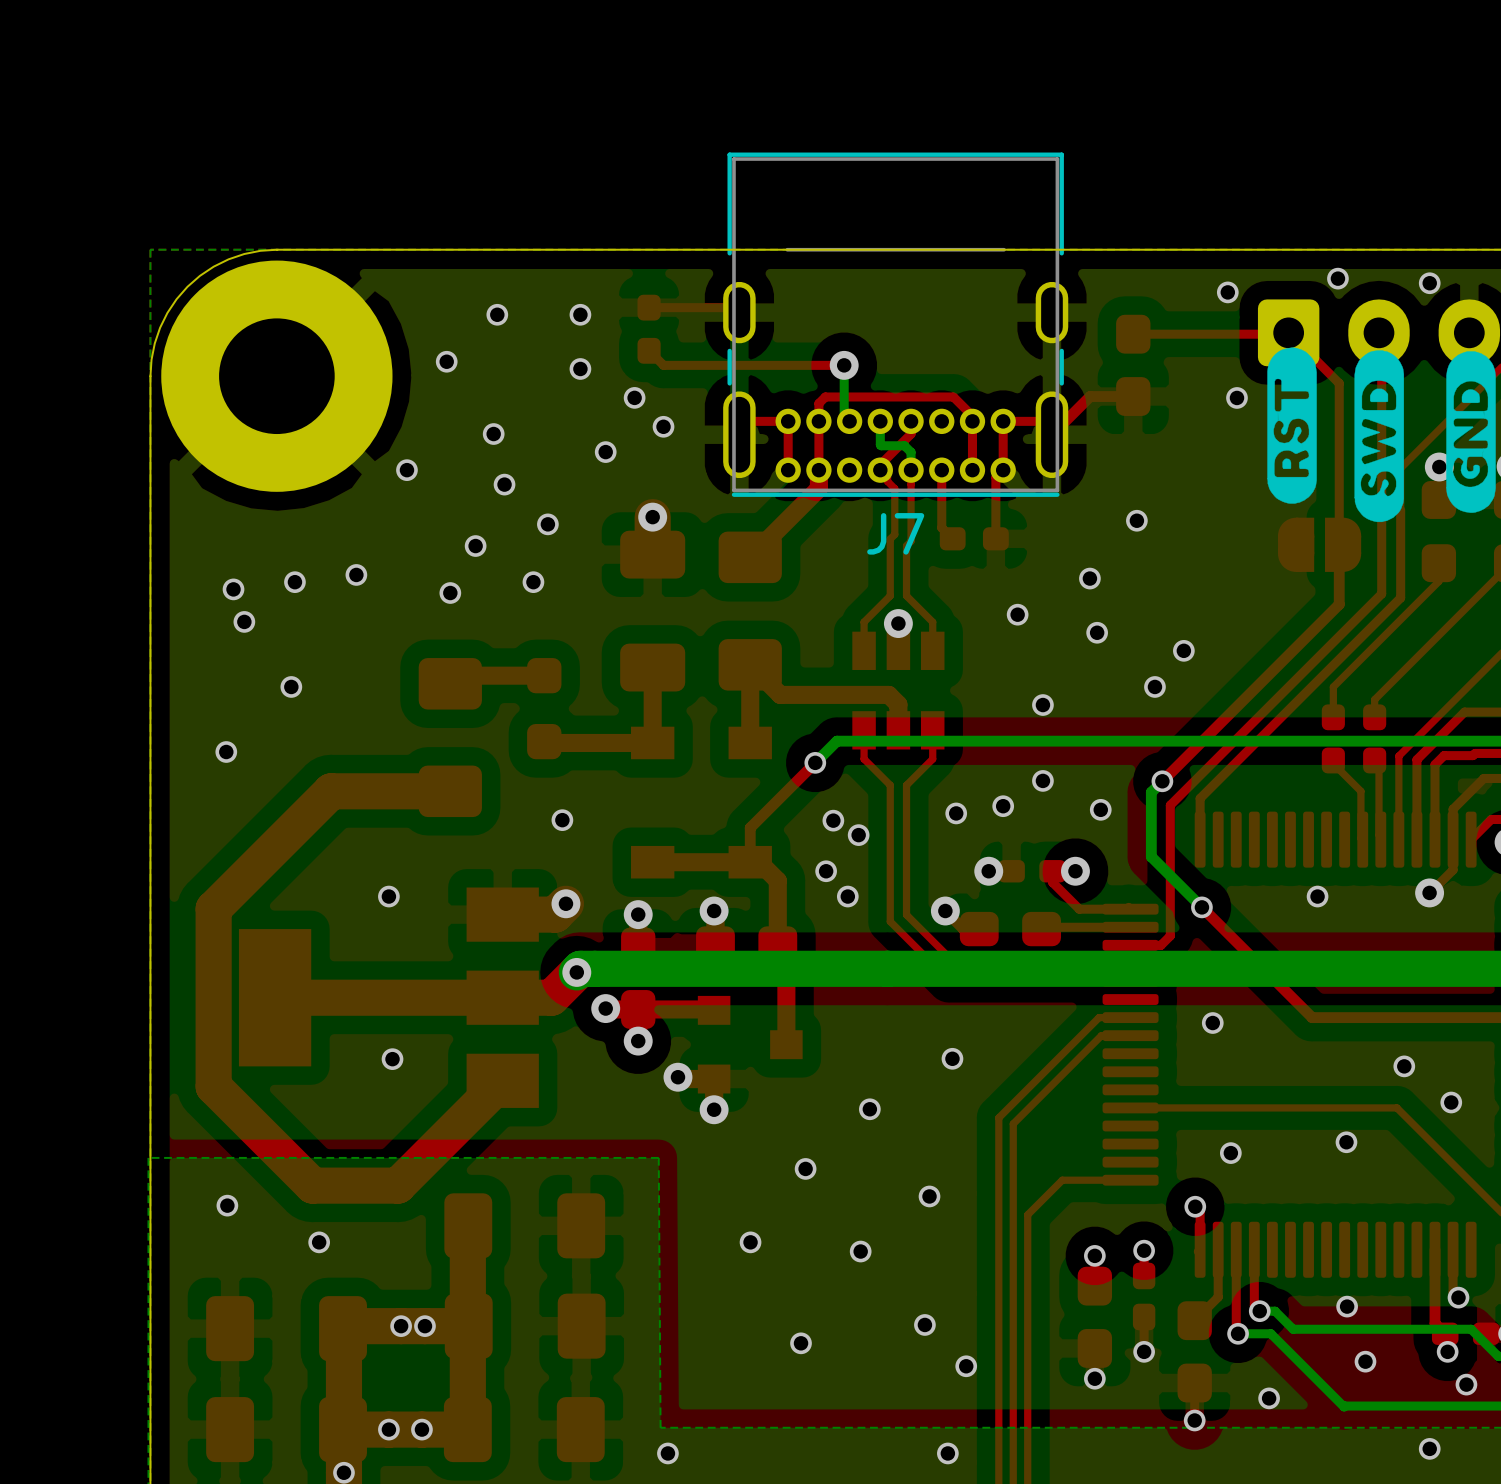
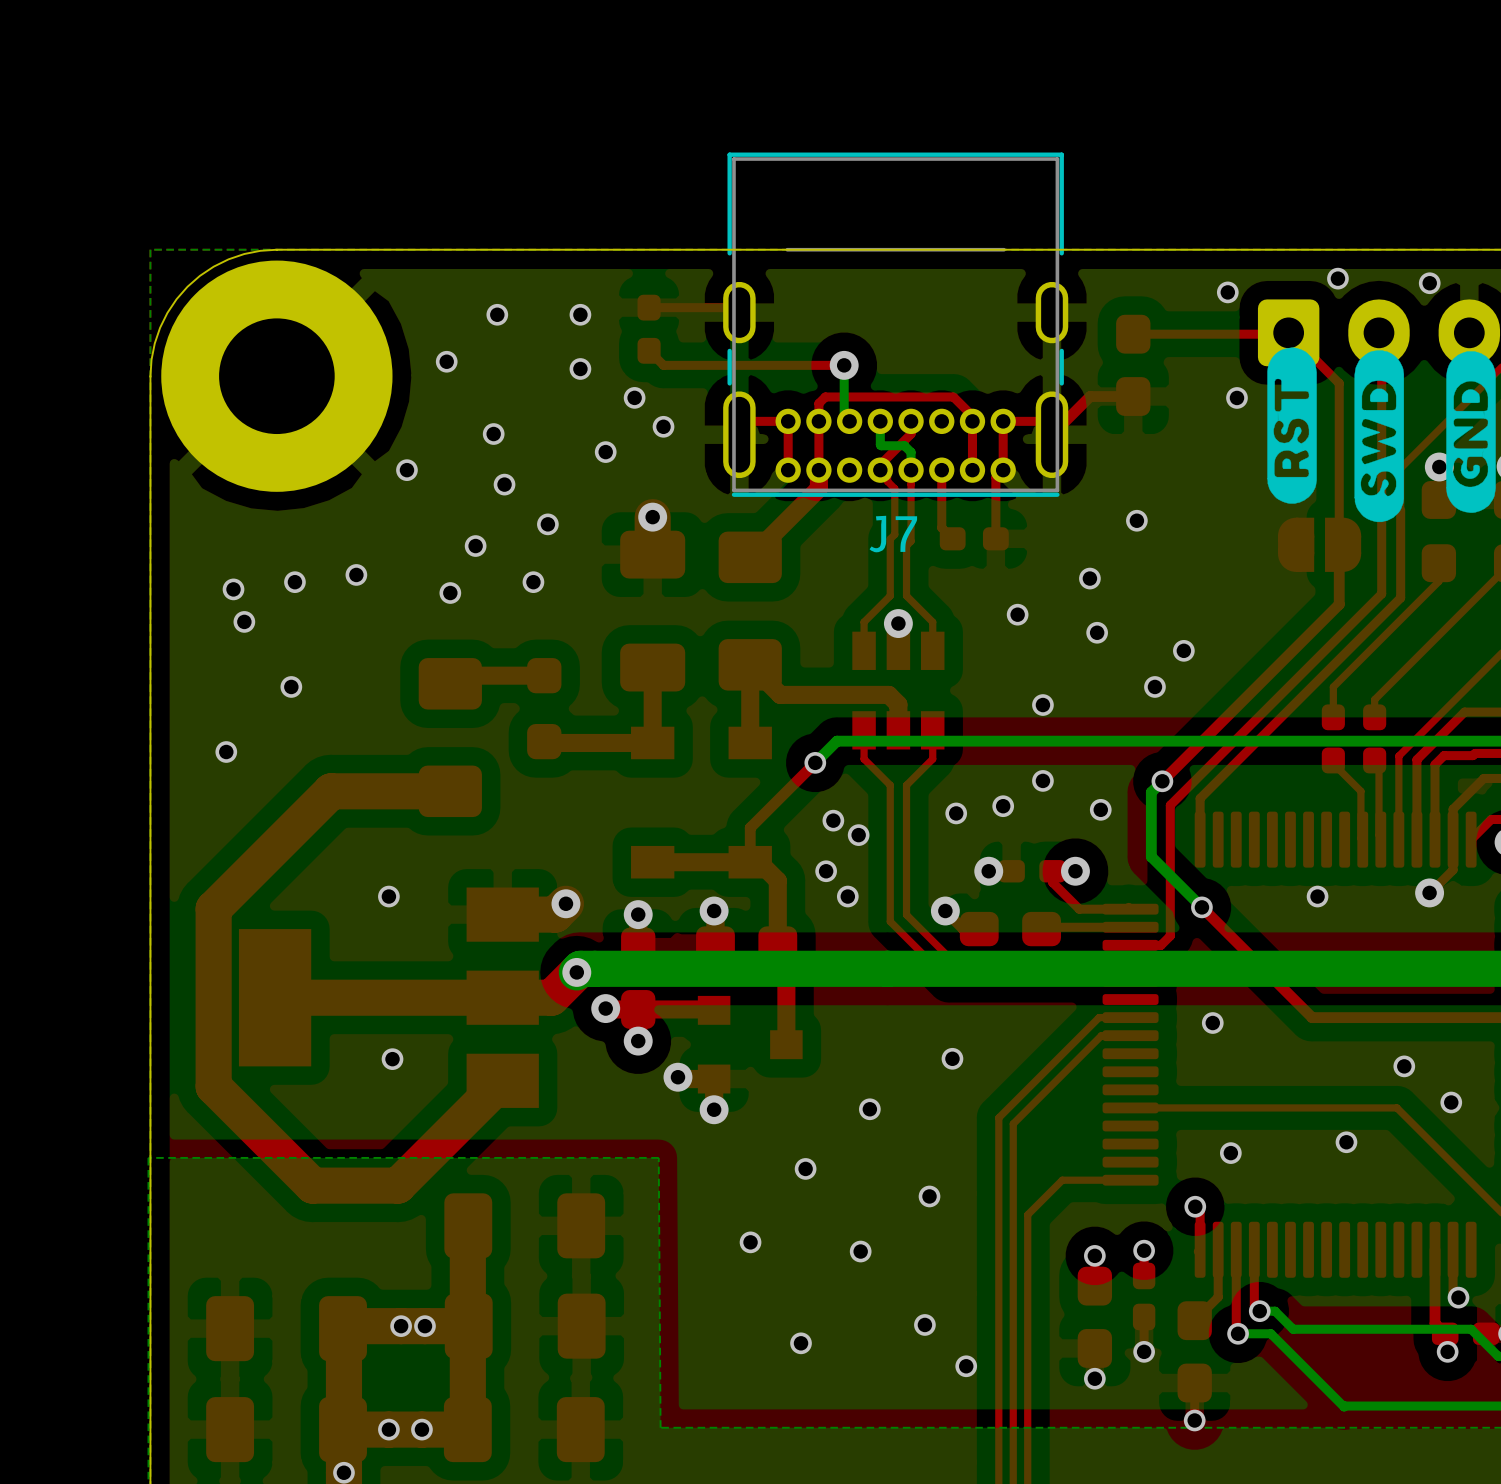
via: (562, 820) -> none
via: (227, 1205) -> none
via: (319, 1242) -> none
via: (1347, 1306) -> none
via: (1365, 1361) -> none
via: (1466, 1384) -> none
via: (1269, 1398) -> none
via: (1429, 1448) -> none
via: (667, 1453) -> none
via: (947, 1453) -> none

